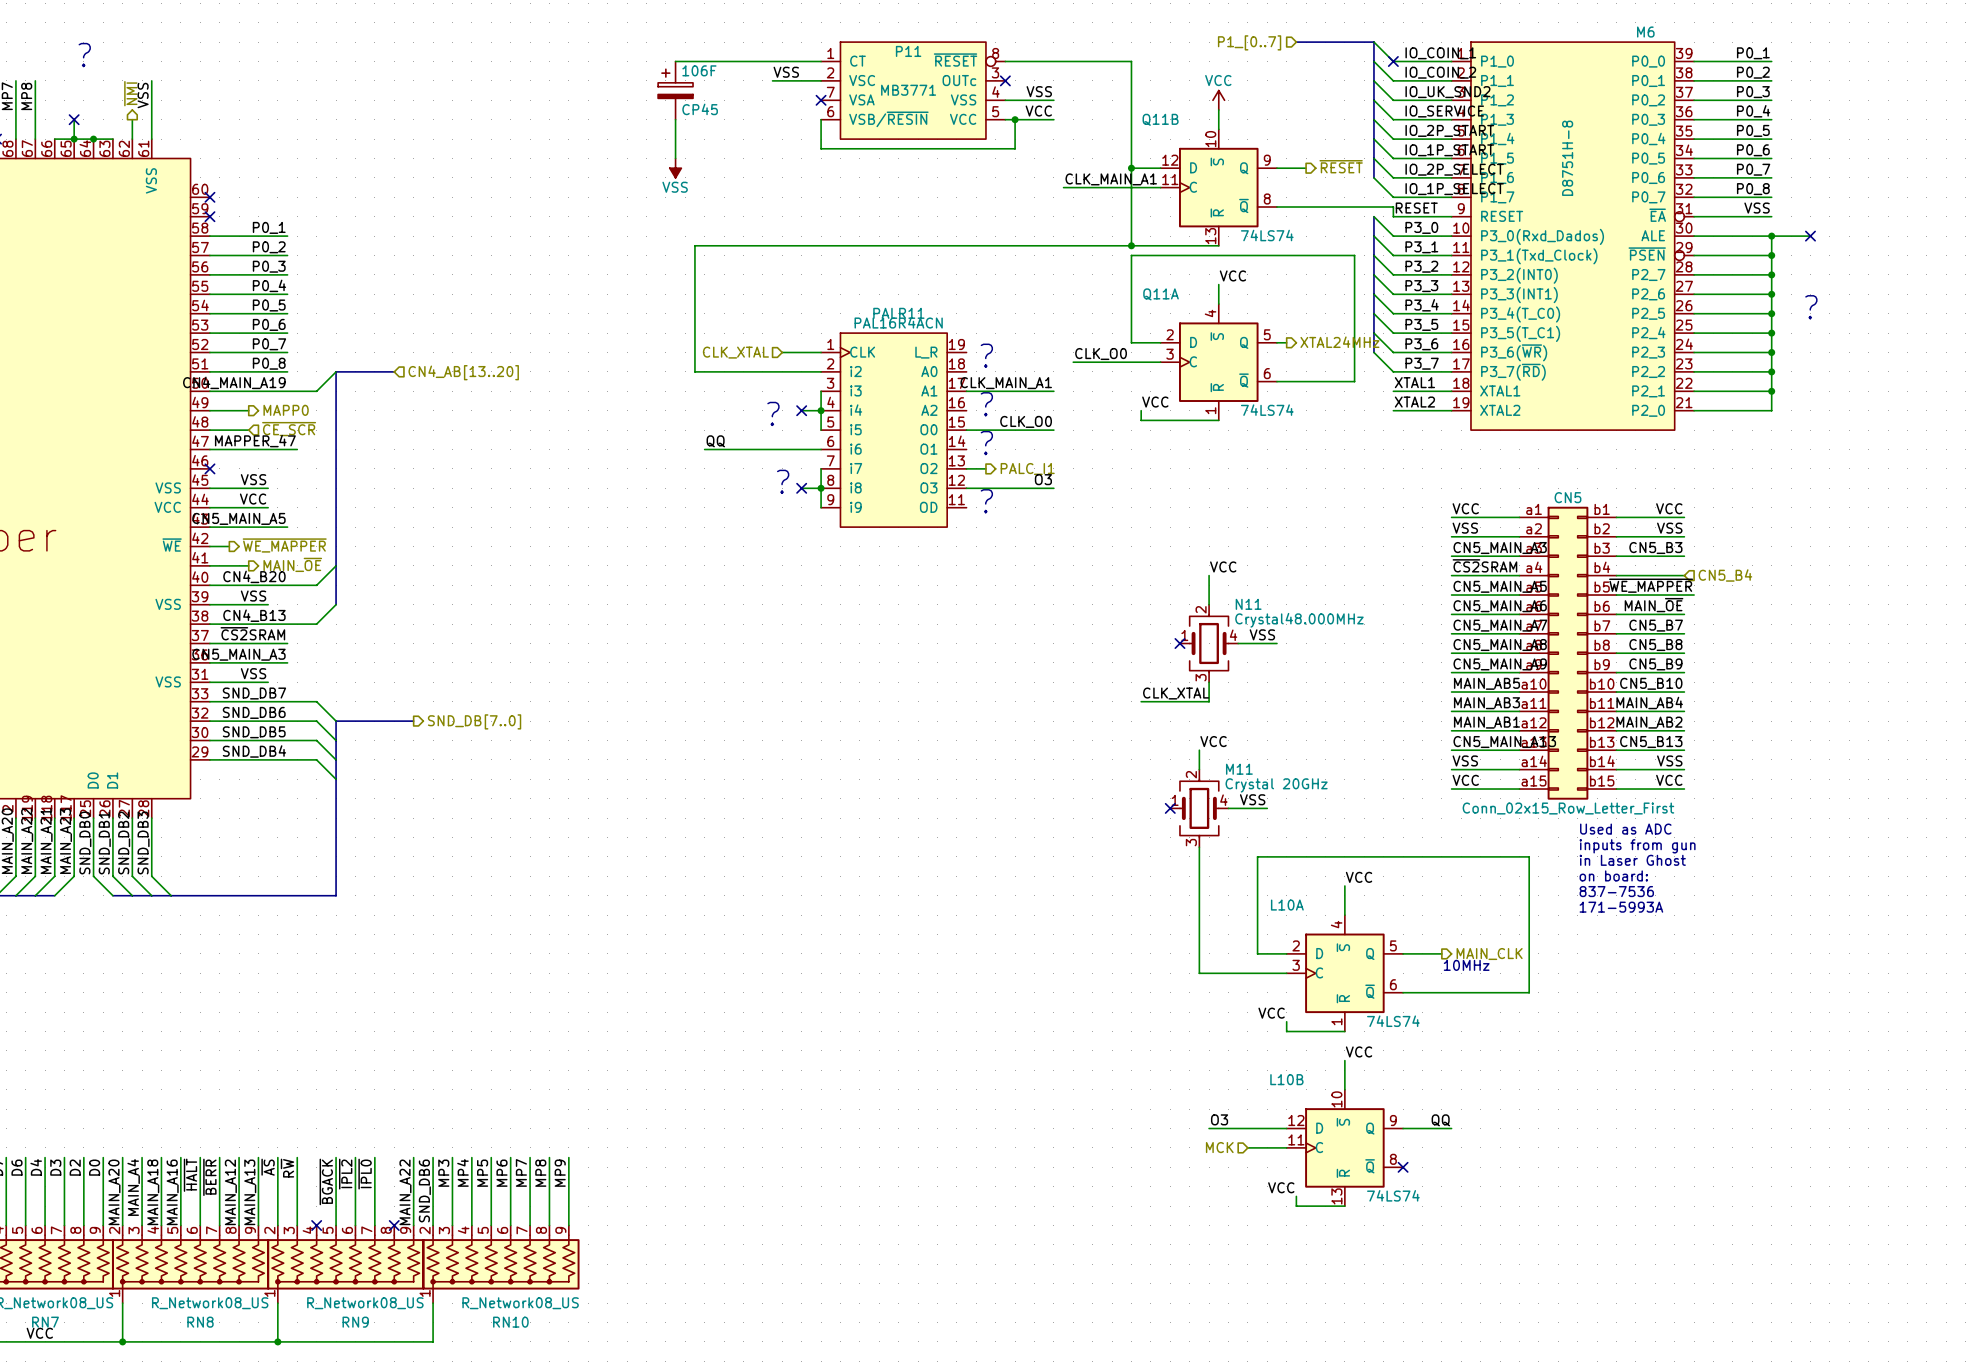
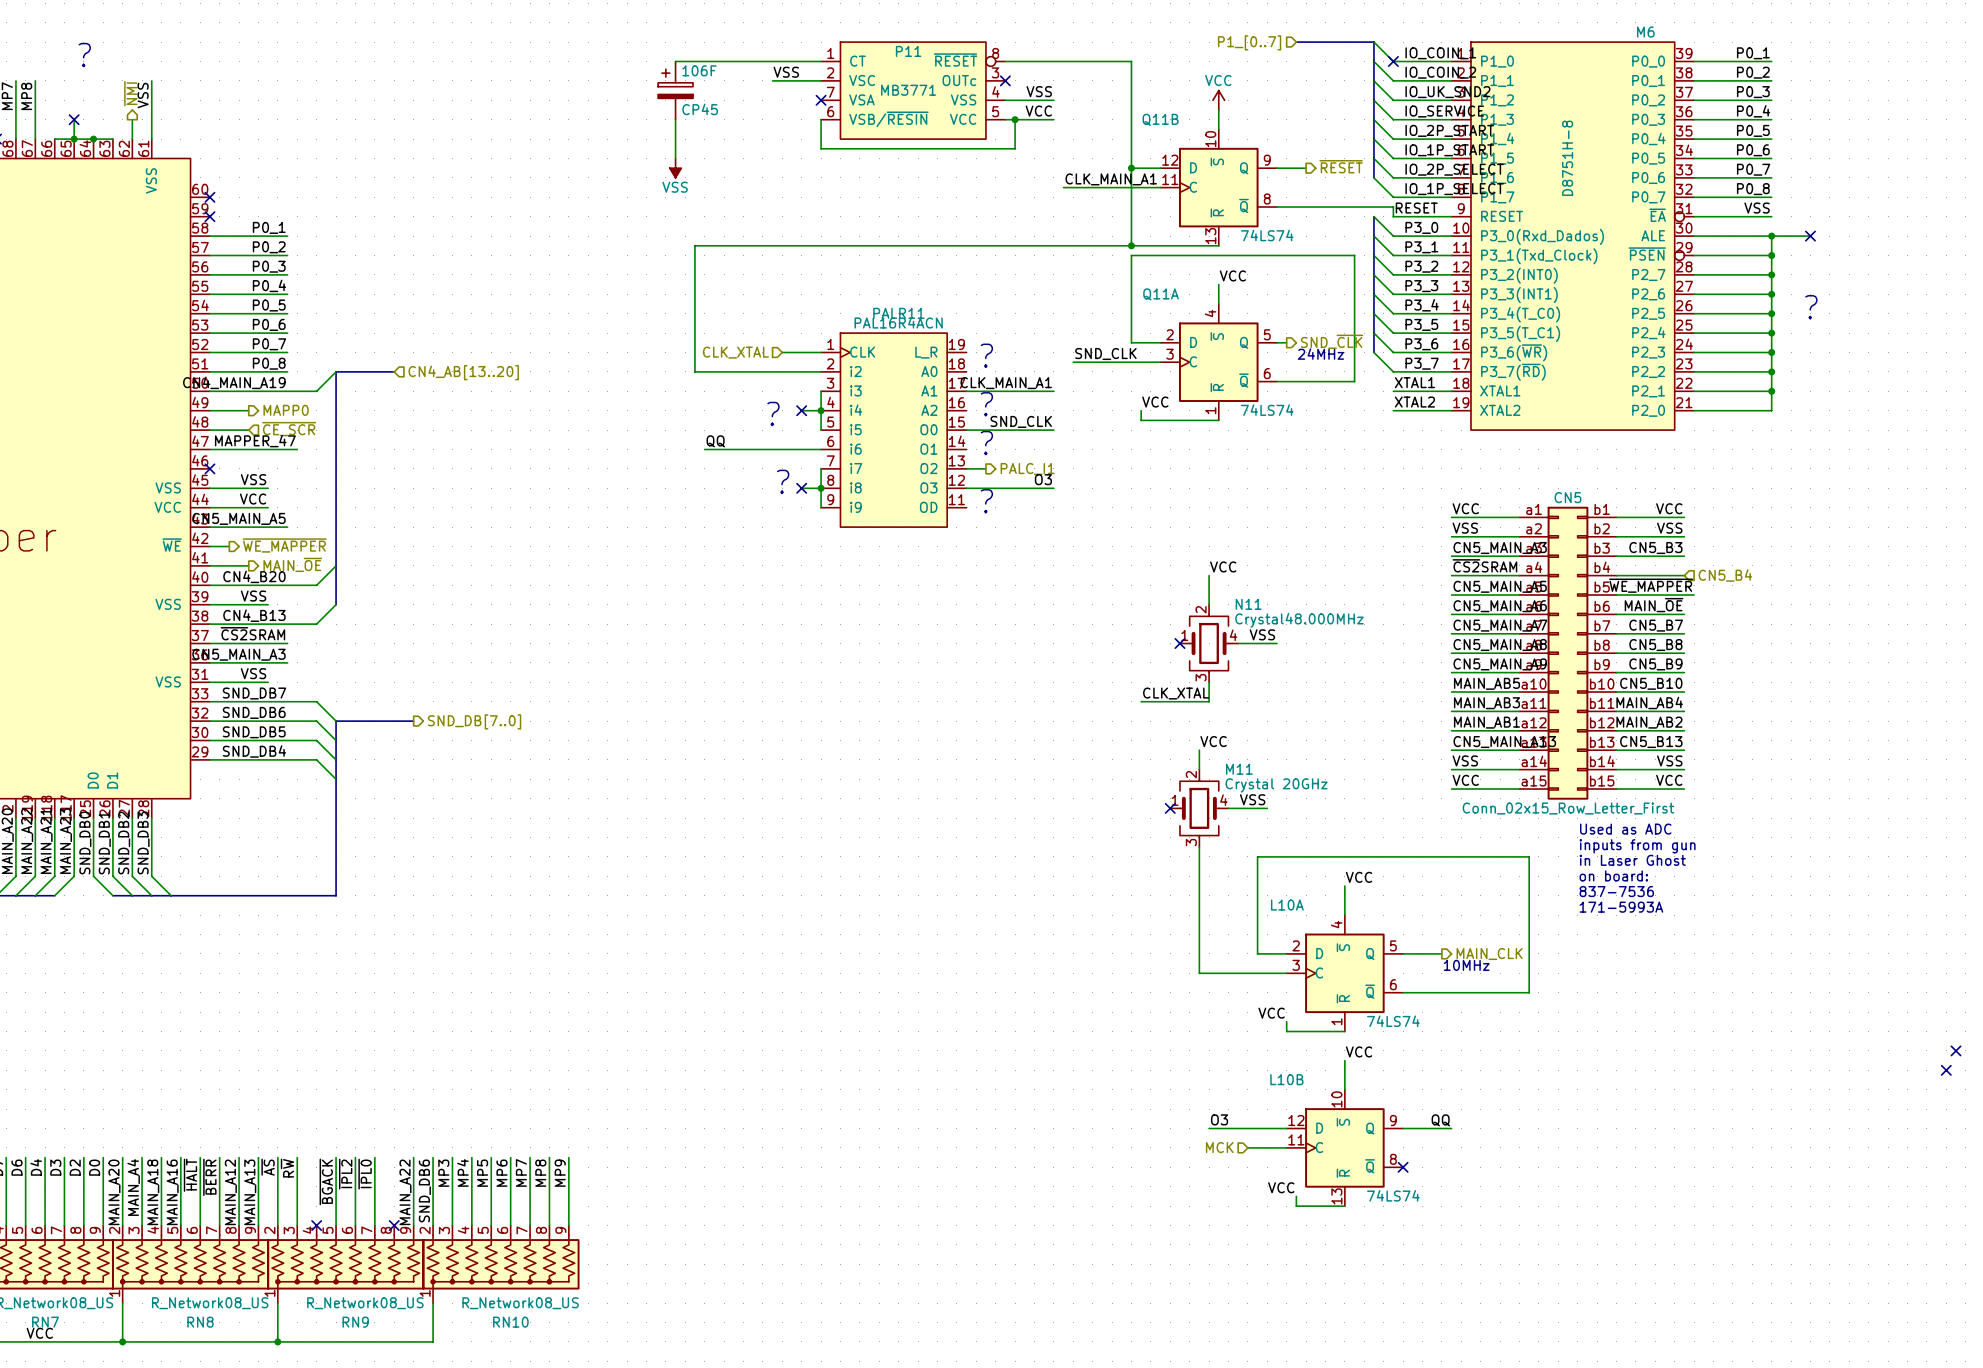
hierarchical label: XTAL24MHz (1339, 342) -> SND_~{CLK} (1332, 341)
label: CLK_O0 (1101, 354) -> SND_CLK (1105, 354)
text: none -> 24MHz (1320, 354)
label: CLK_O0 (1026, 421) -> SND_CLK (1021, 421)
no-connect mark: none -> (1955, 1050)
no-connect mark: none -> (1946, 1070)

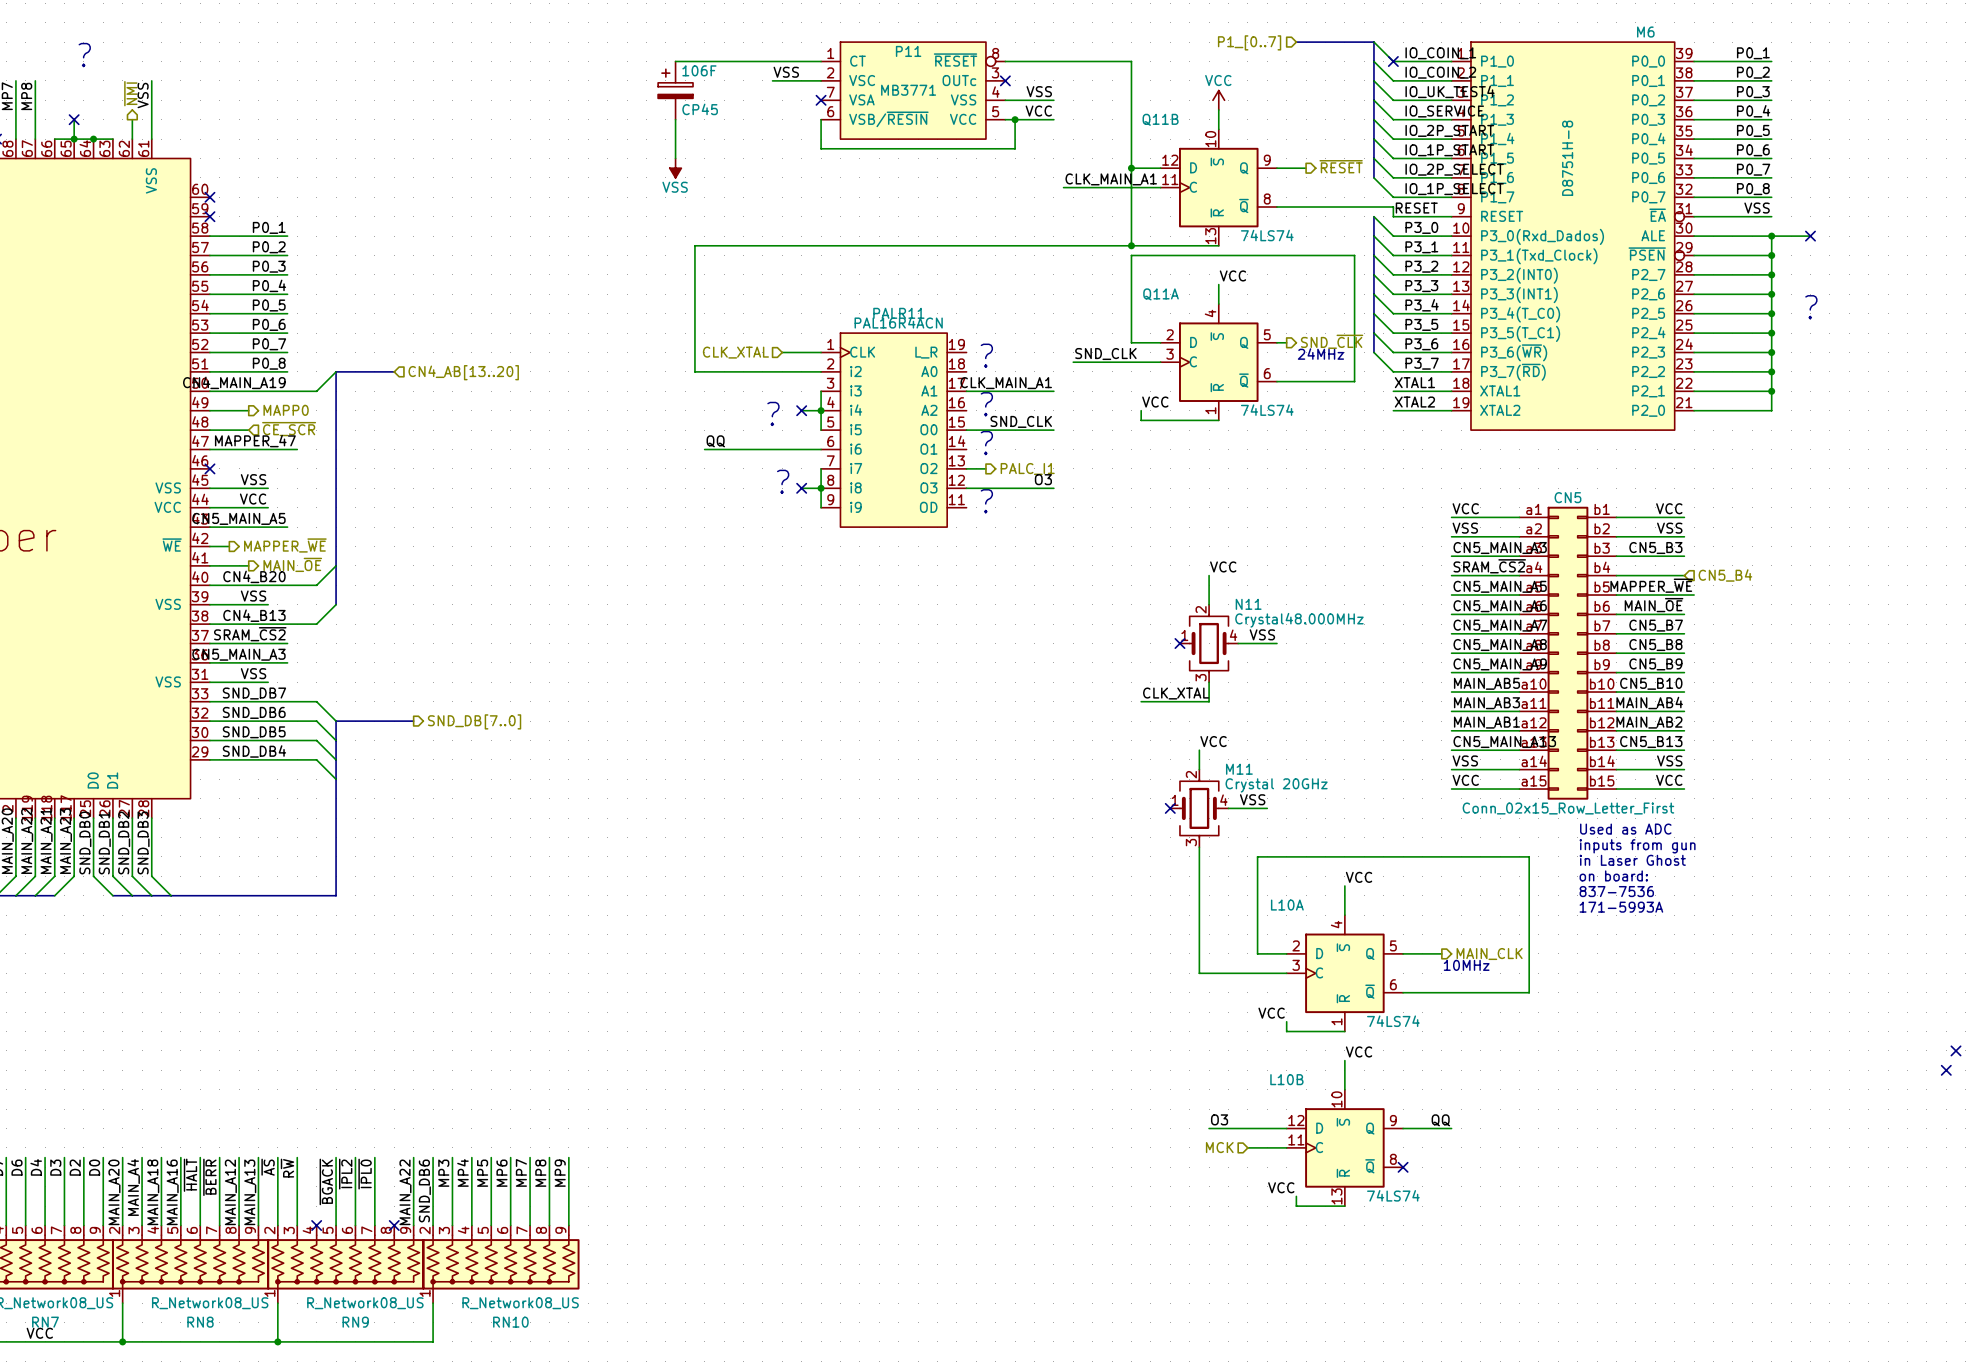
label: IO_UK_SND2 (1447, 92) -> IO_UK_TEST4 (1450, 91)
hierarchical label: ~{WE_MAPPER} (284, 545) -> MAPPER_~{WE} (285, 545)
label: ~{CS2}SRAM (1484, 565) -> SRAM_~{CS2} (1489, 566)
label: ~{WE_MAPPER} (1651, 585) -> MAPPER_~{WE} (1651, 585)
label: ~{CS2}SRAM (252, 633) -> SRAM_~{CS2} (250, 634)

